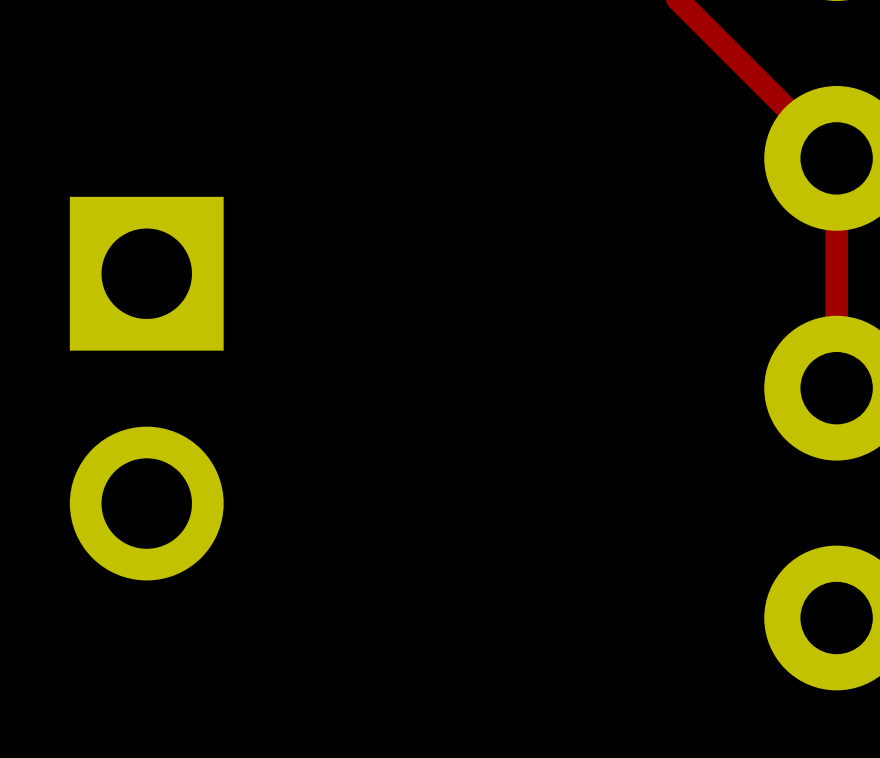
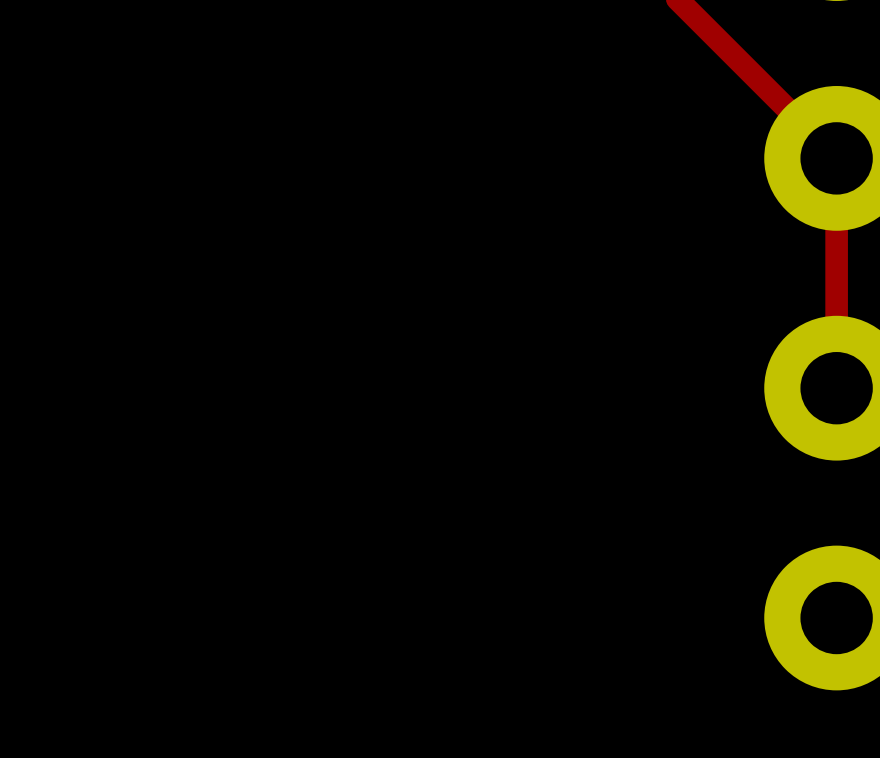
part: (146, 388) -> none

